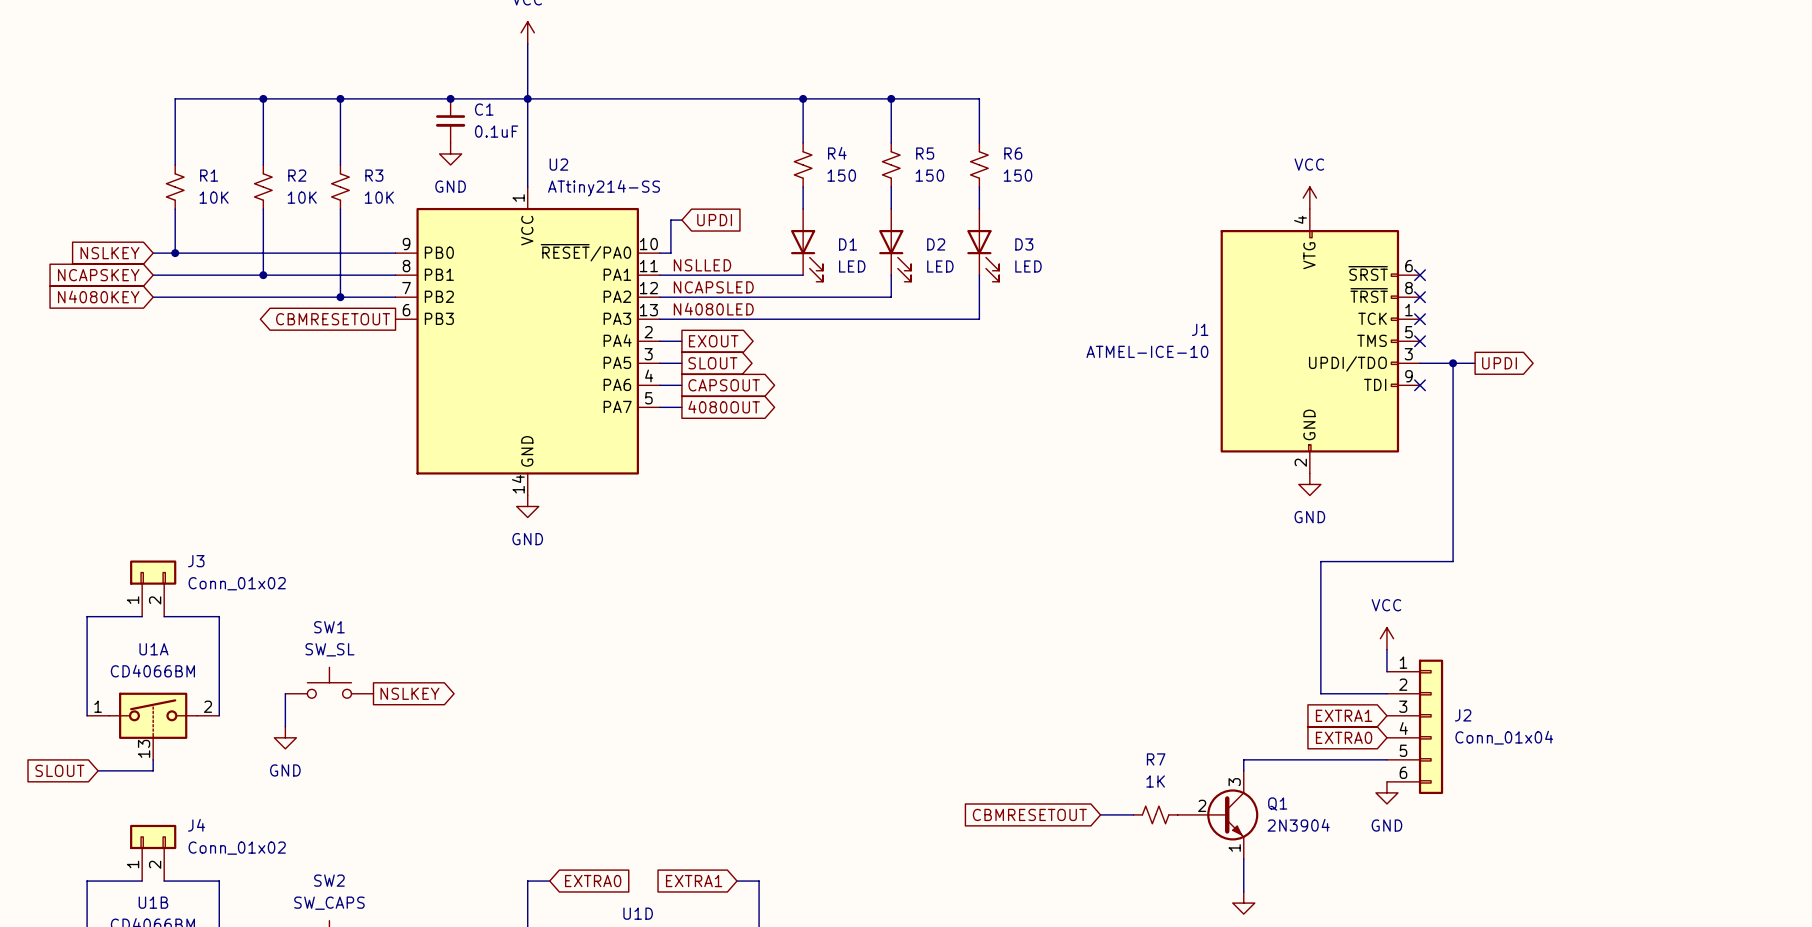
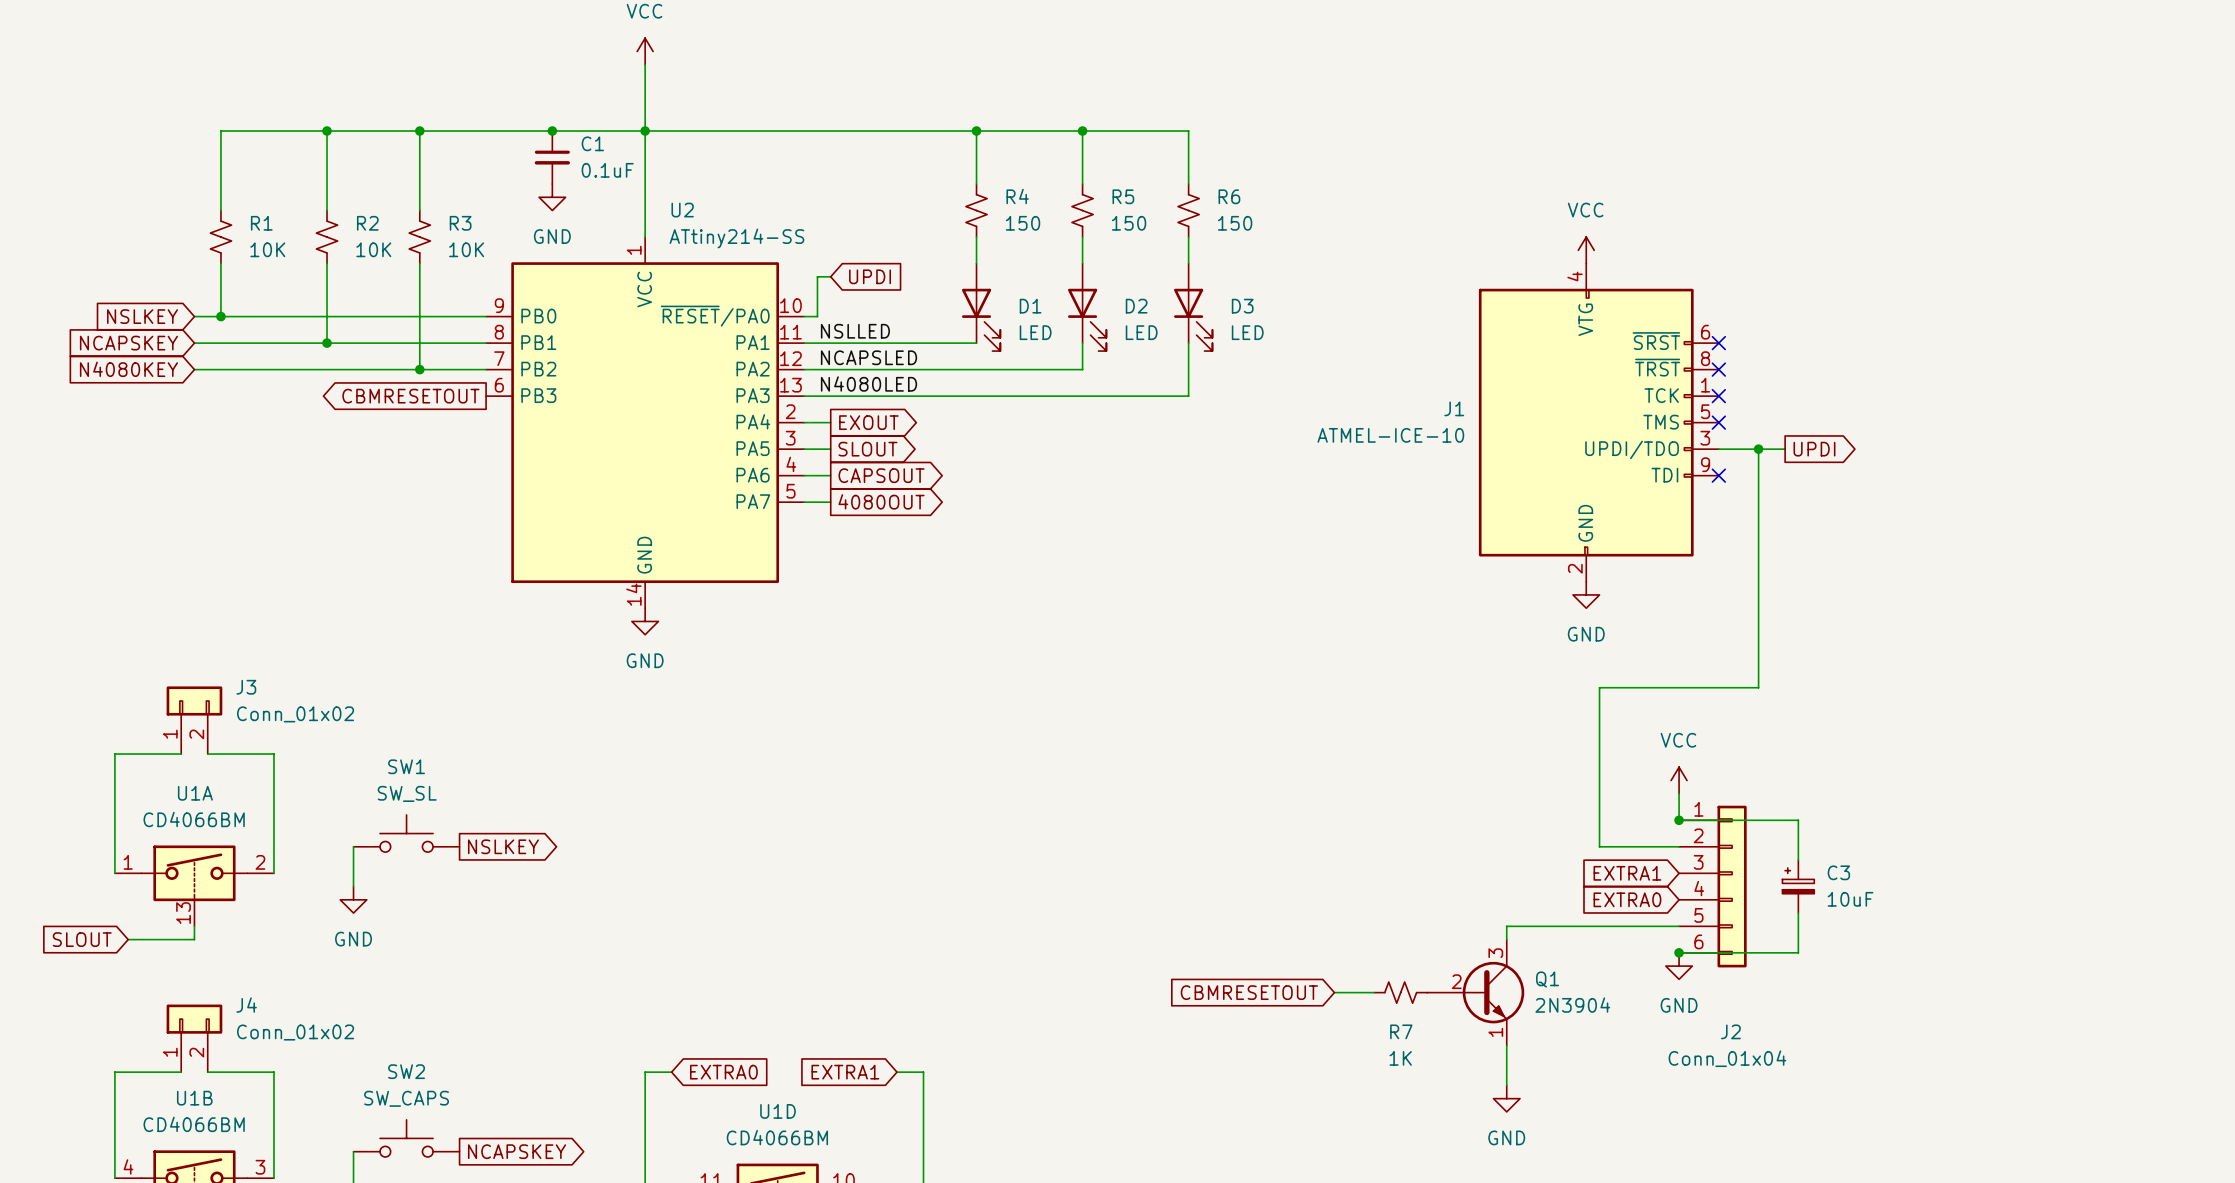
wire: none -> (1679, 820) (1798, 820) (1798, 860)
junction: none -> (1679, 820)
J2 name position: J2 (1463, 715) -> J2 (1730, 1031)
C3: none -> 10uF (1798, 886)
J2 value position: Conn_01x04 (1504, 737) -> Conn_01x04 (1727, 1058)
wire: none -> (1798, 913) (1798, 952) (1679, 952)
R7 name position: R7 (1156, 759) -> R7 (1401, 1031)
R7 value position: 1K (1155, 781) -> 1K (1400, 1058)
junction: none -> (1679, 952)

